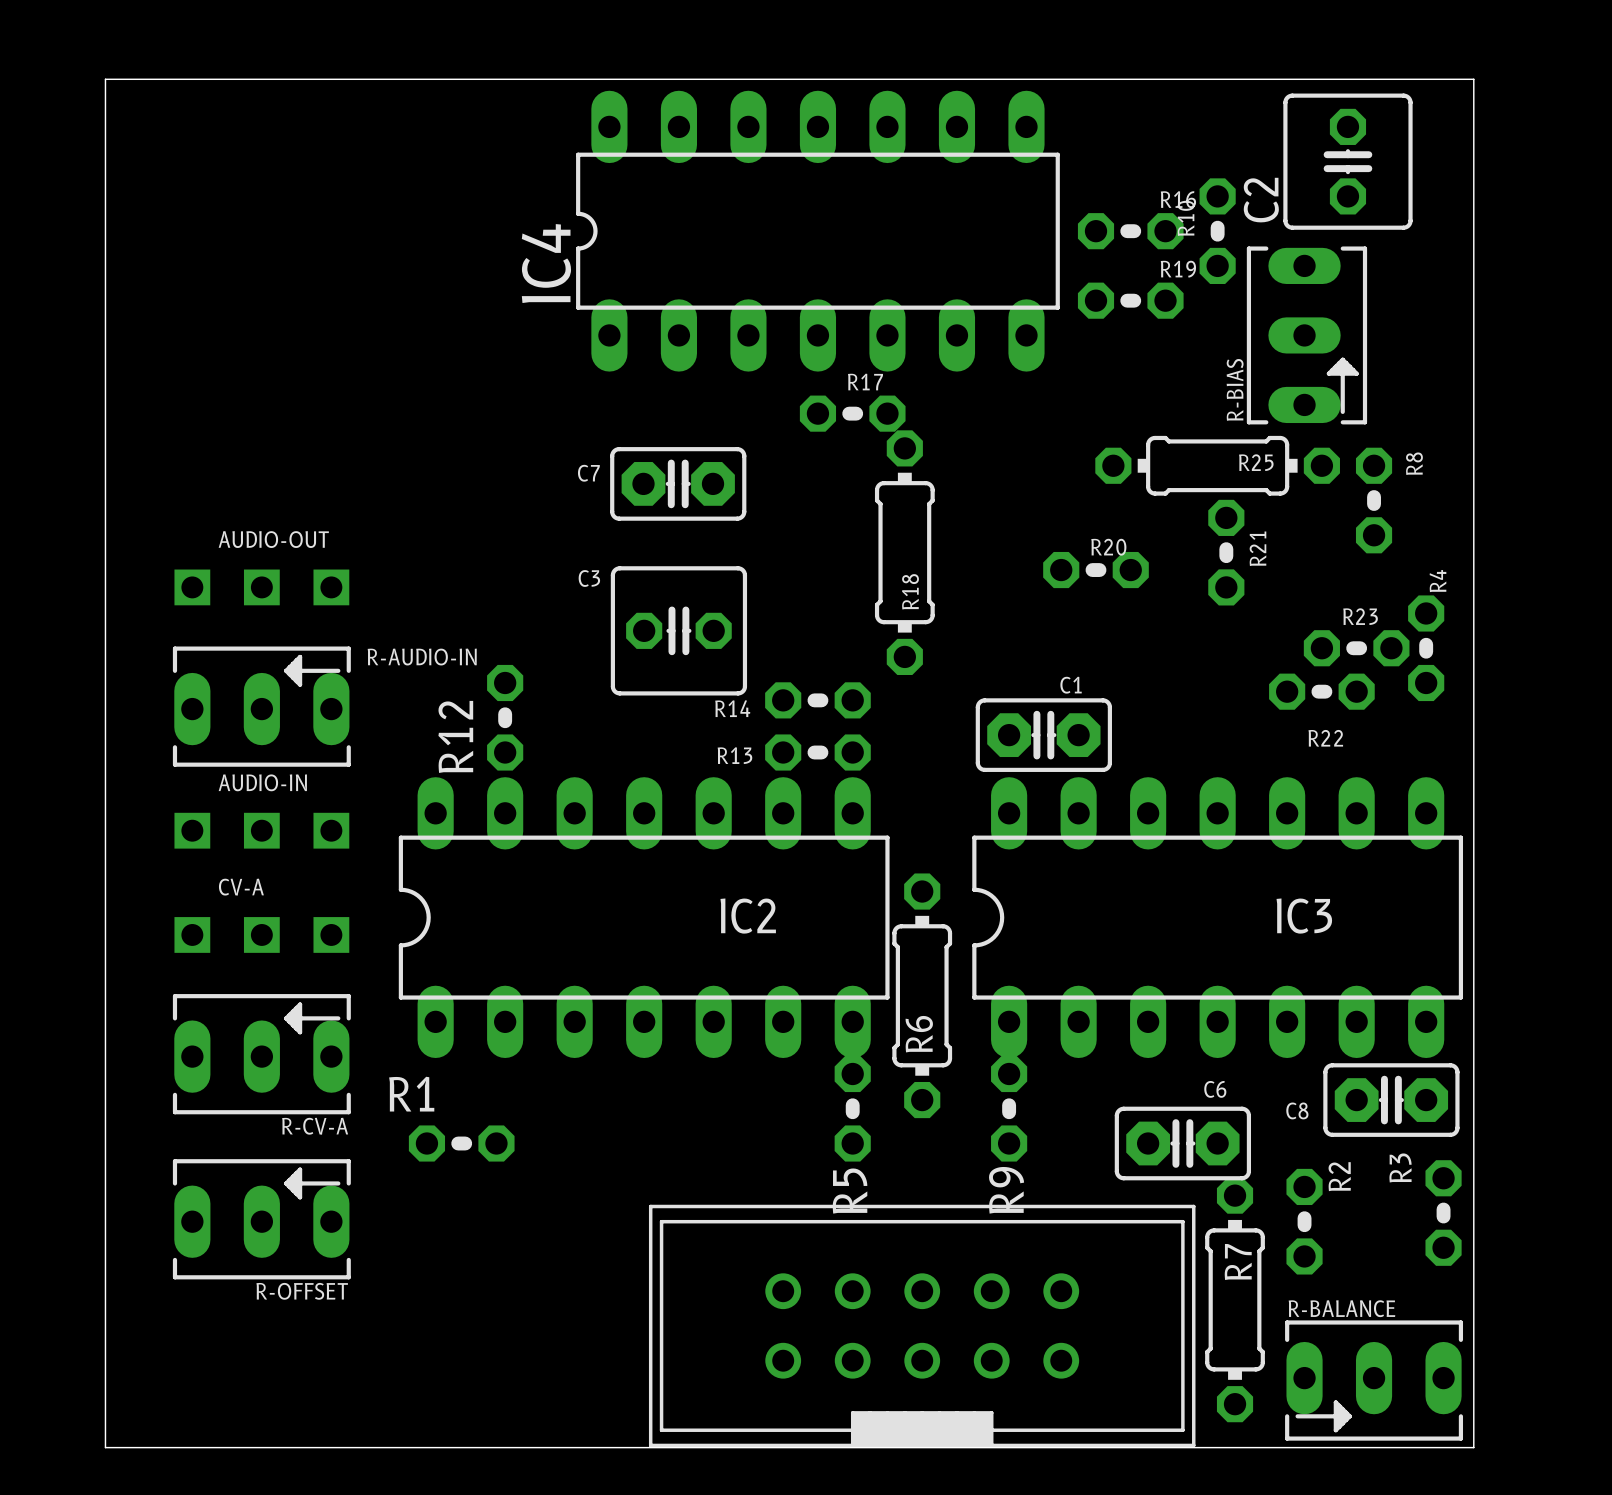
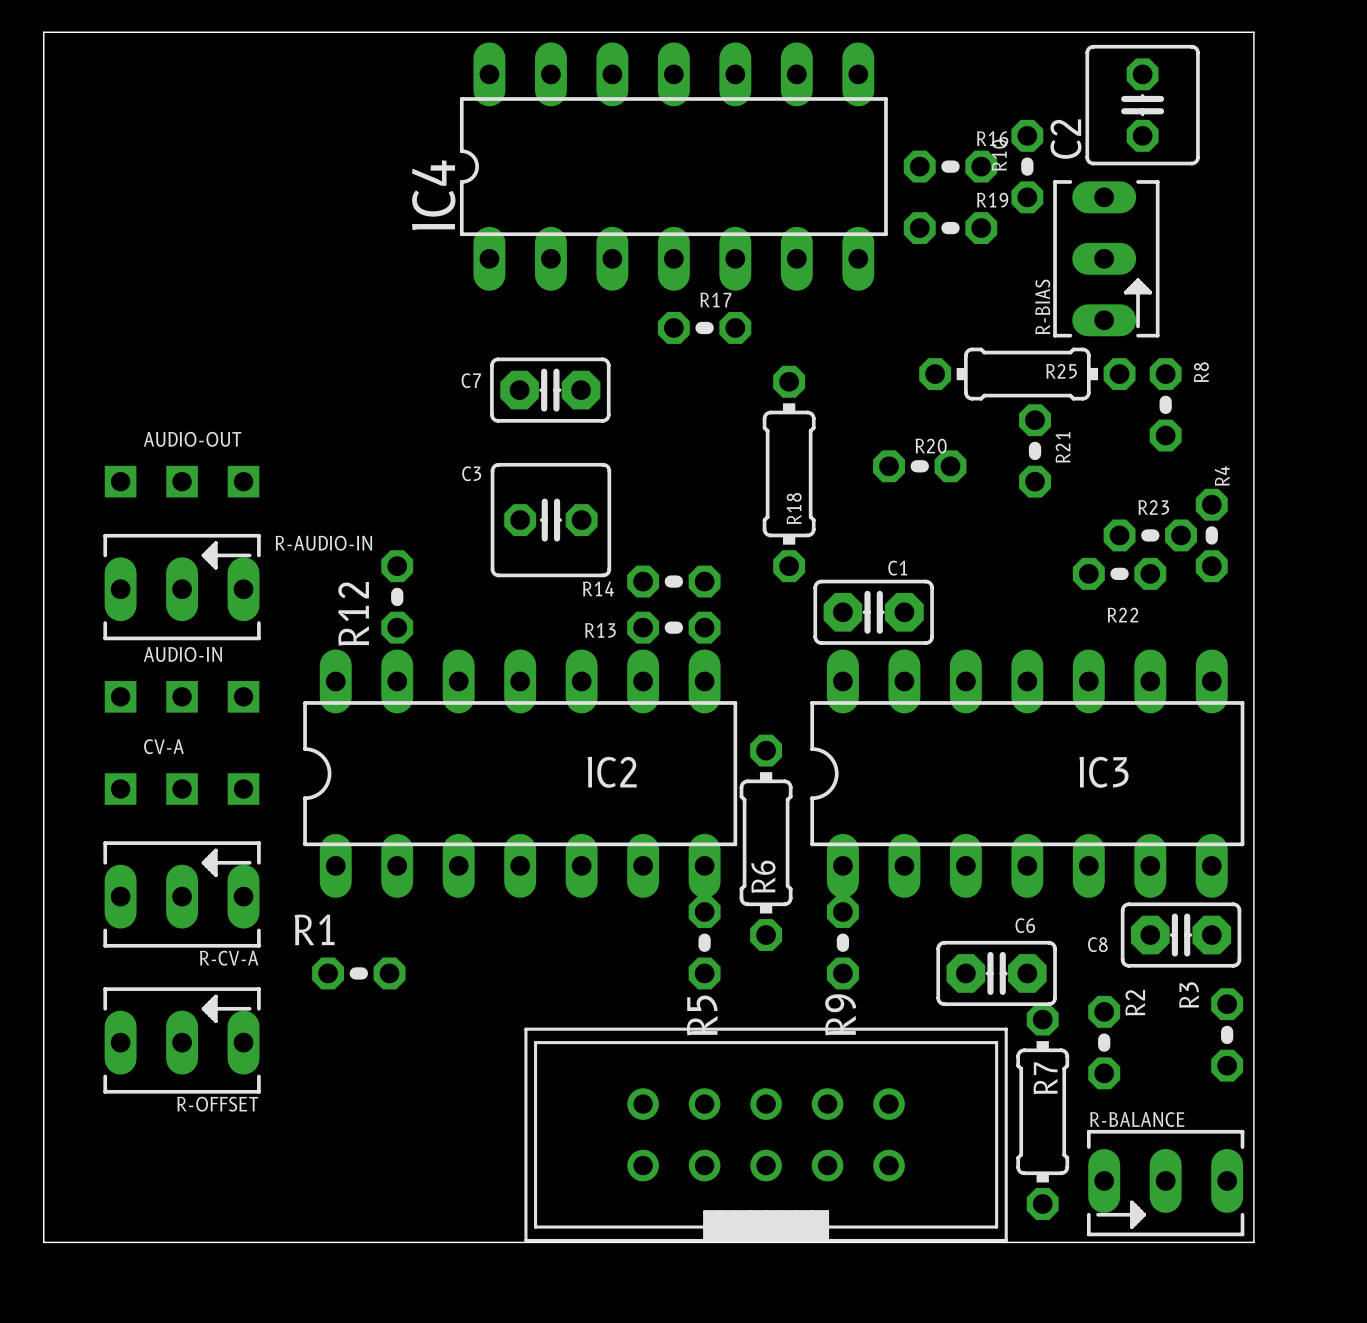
R18 position: (904, 552) -> (789, 473)

